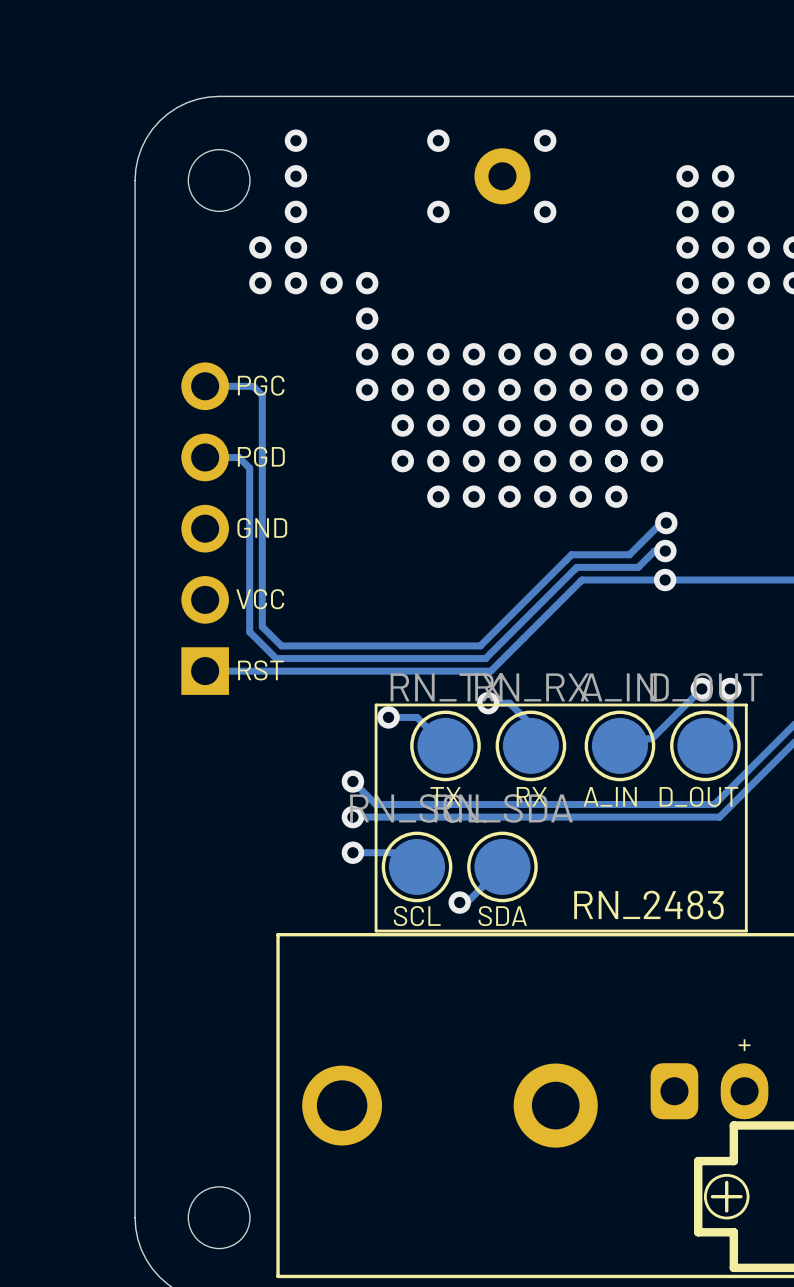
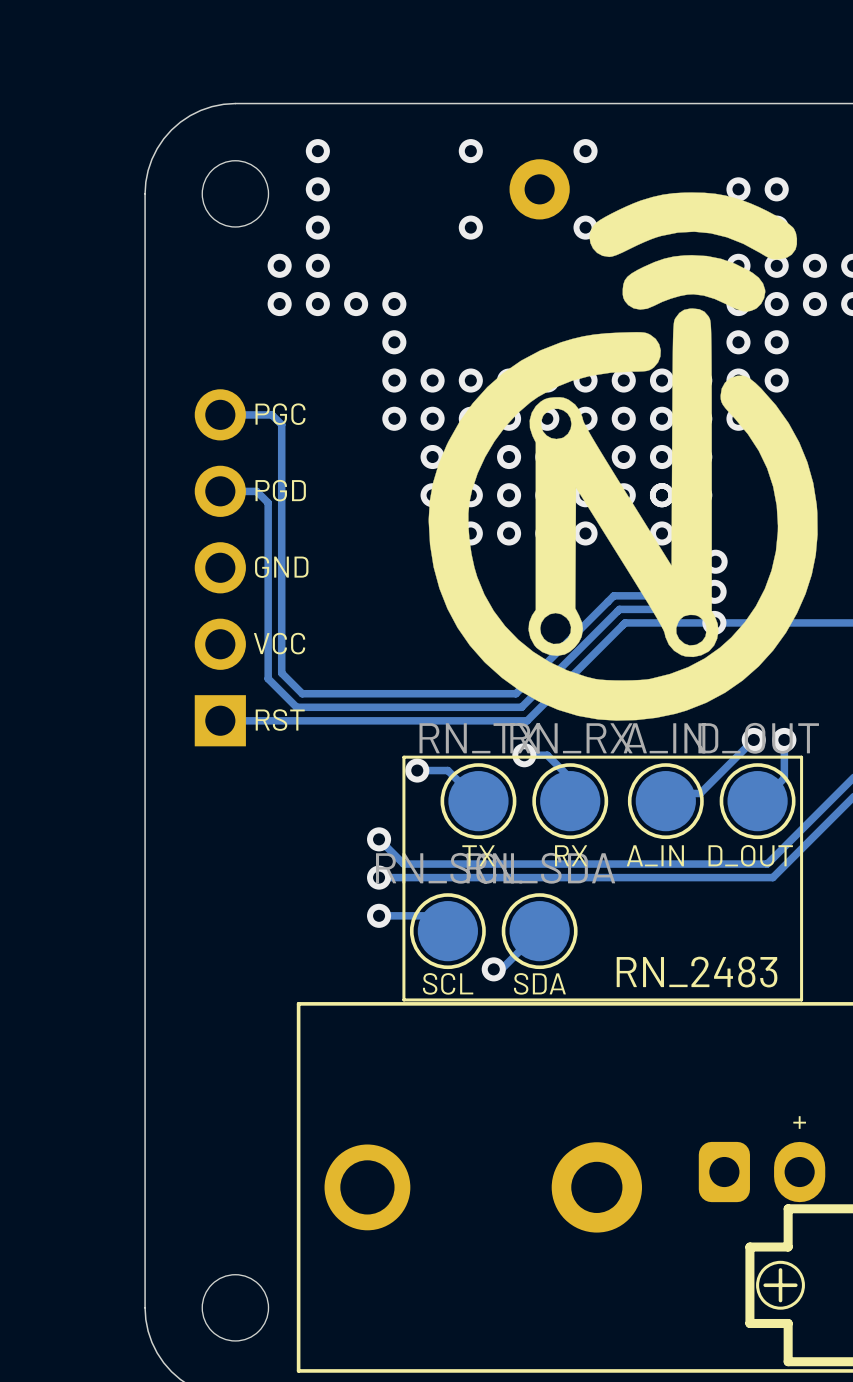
drawing: none -> [428, 192, 818, 721]

